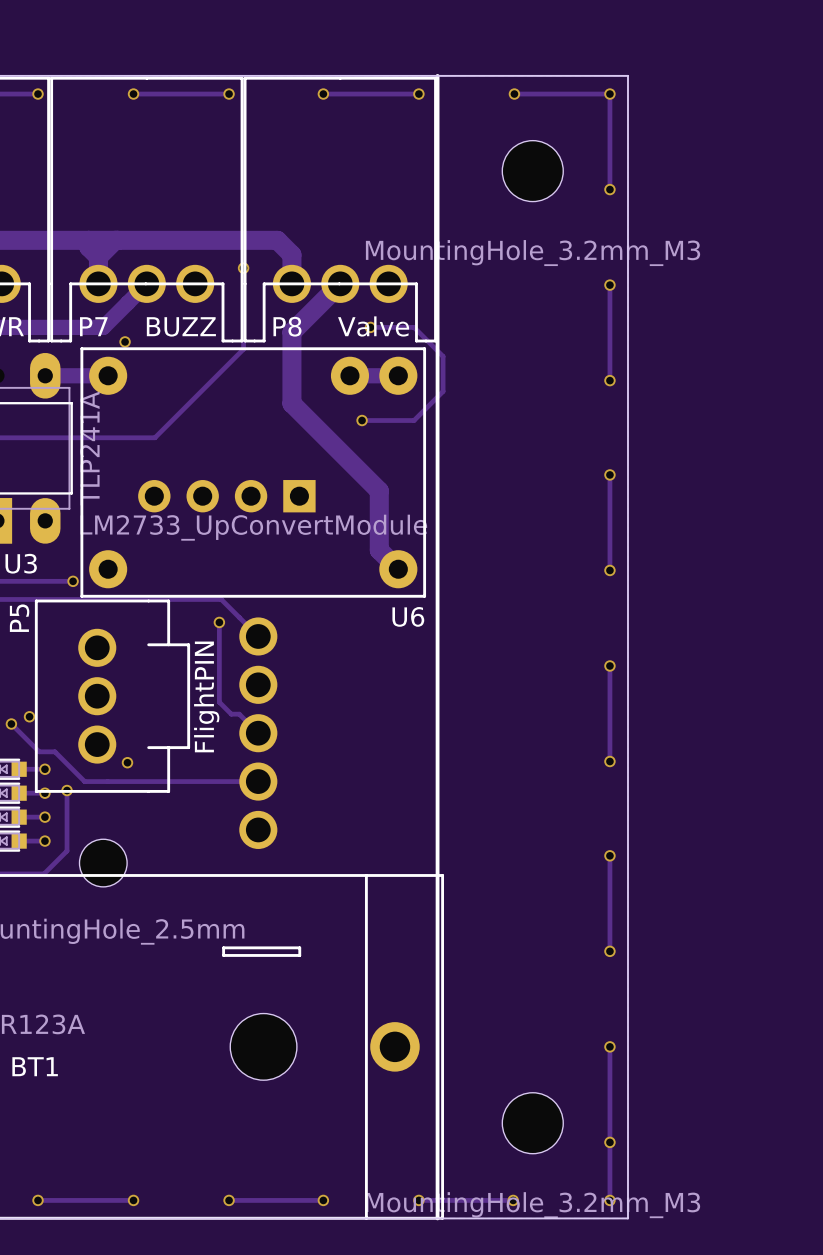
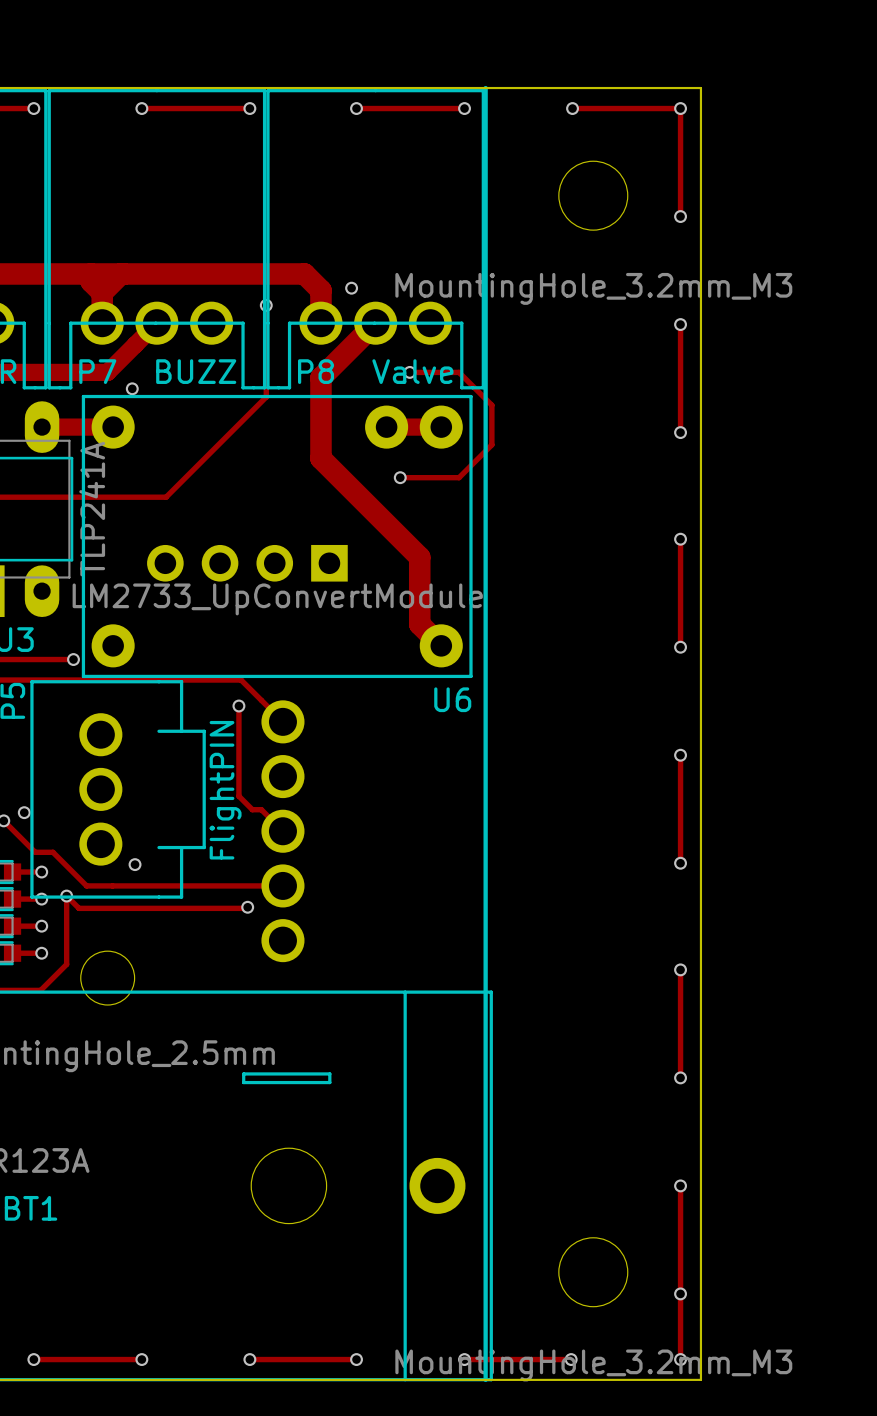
via: none -> (351, 288)
track: none -> (66, 896) (78, 908) (247, 907)
via: none -> (247, 907)

